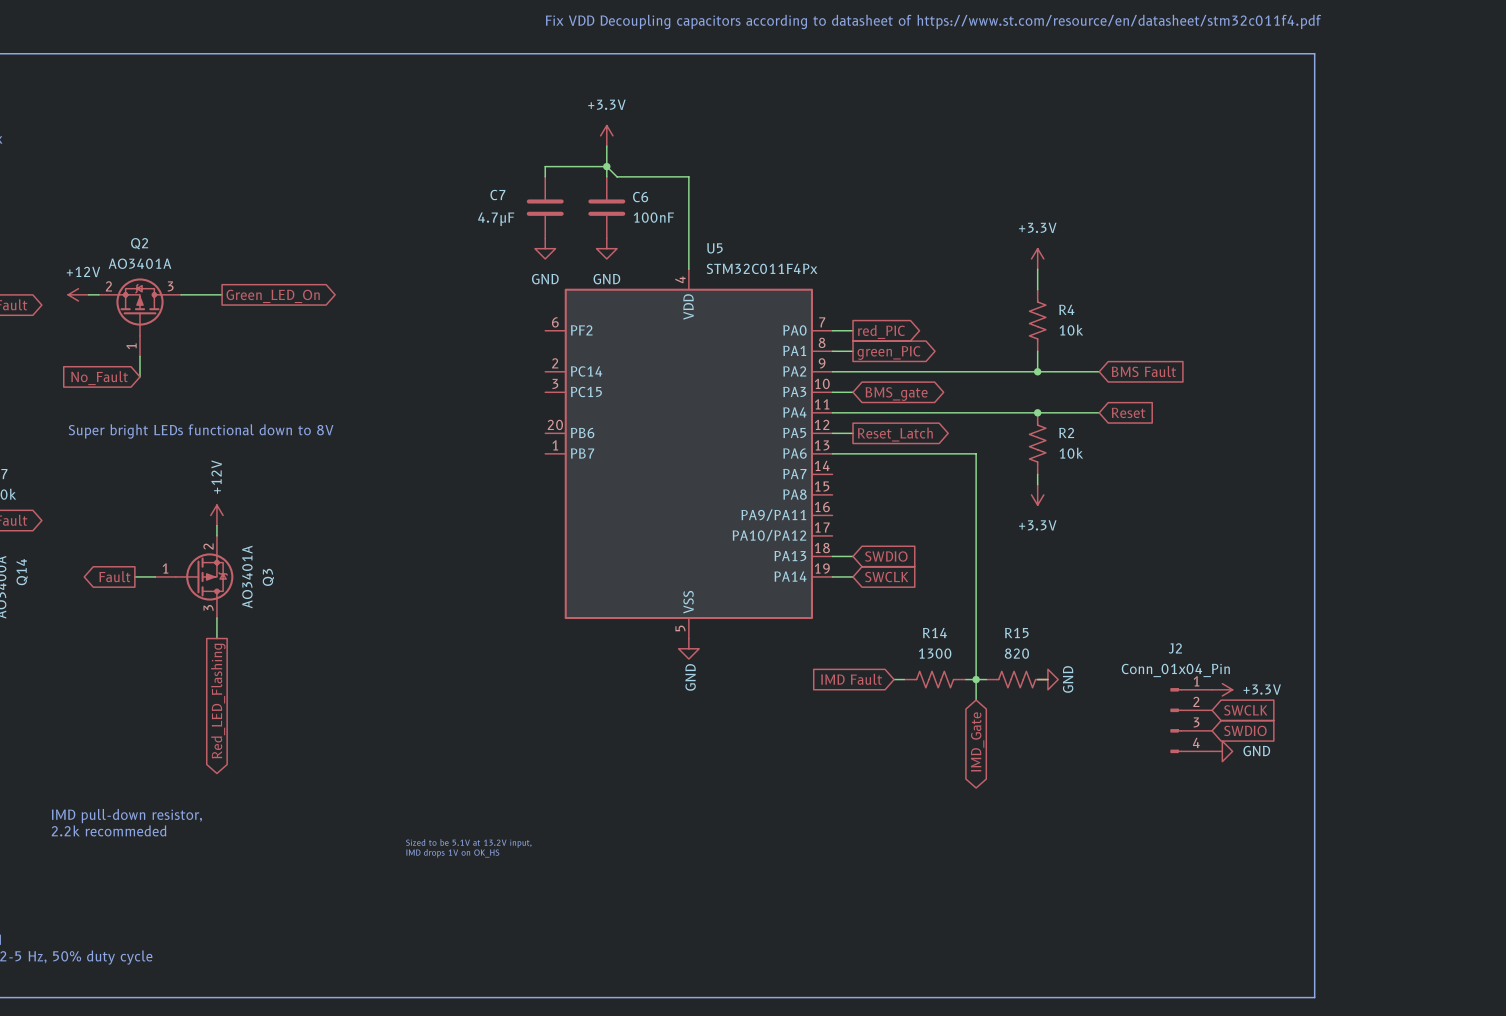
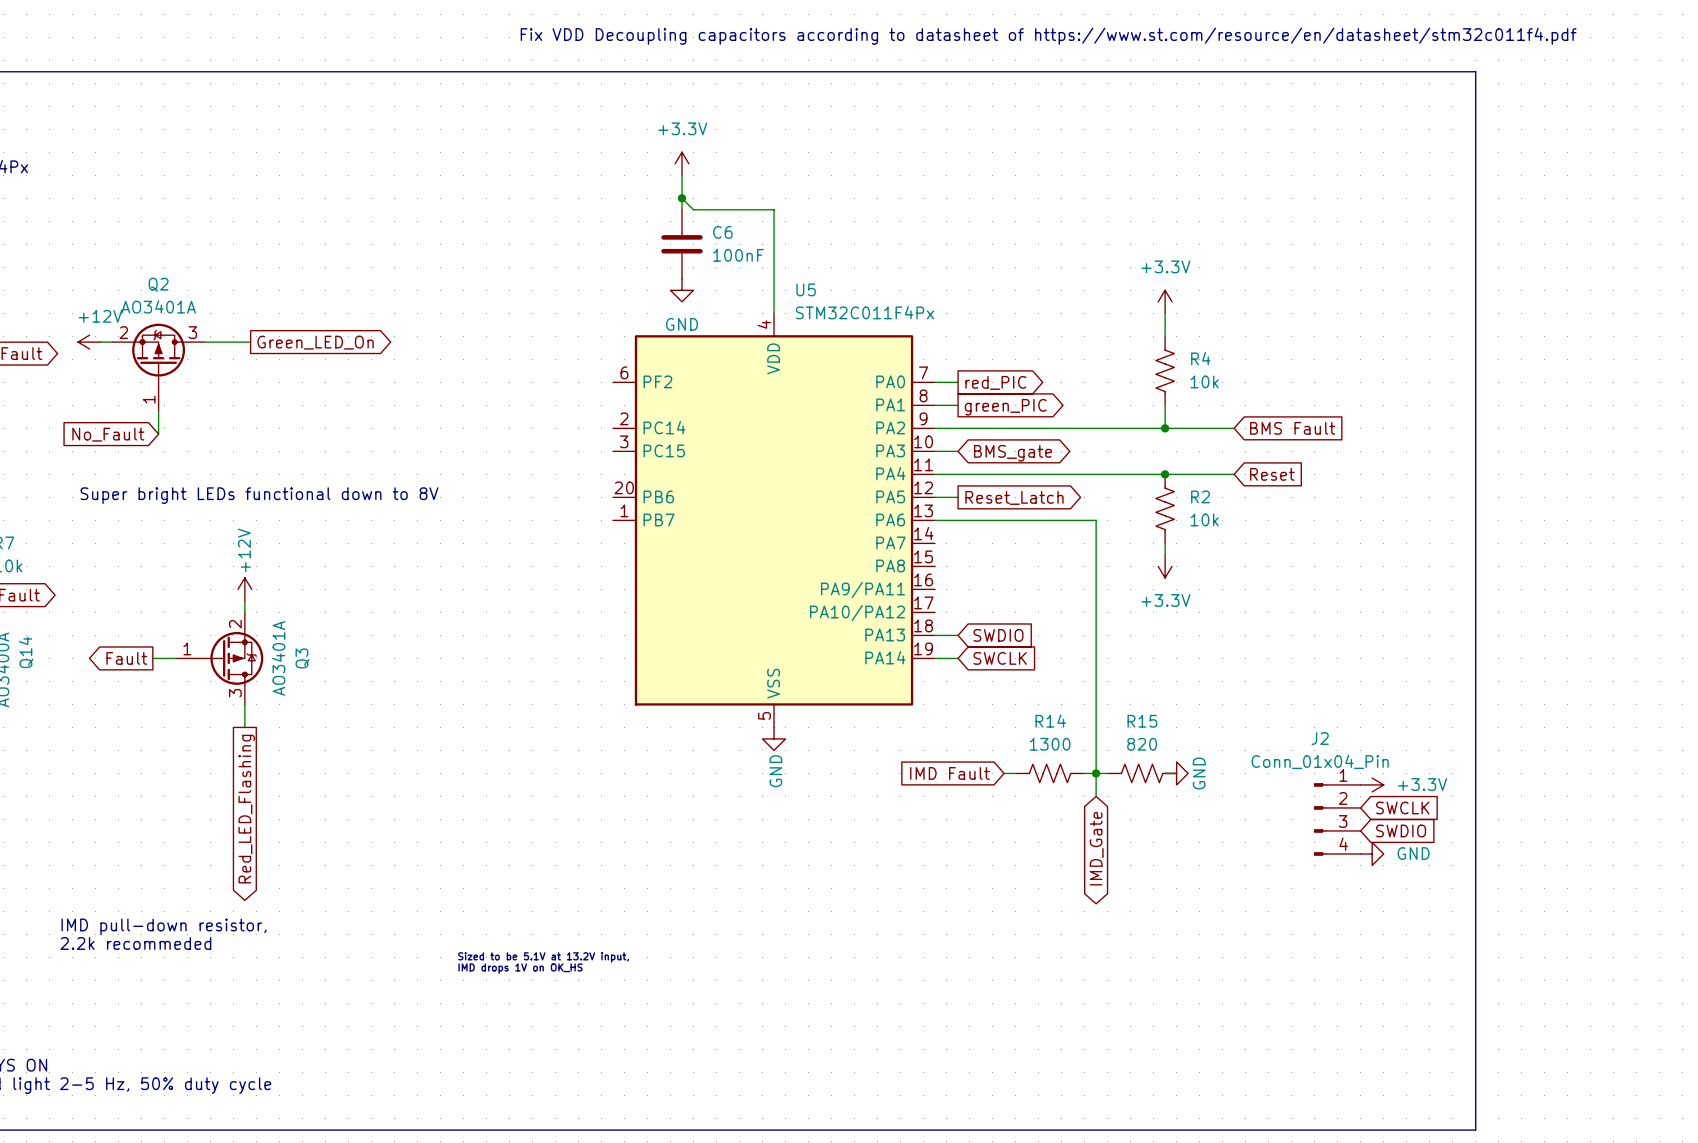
wire: (606, 166) (545, 166) (545, 176) -> none
C7: 4.7μF (545, 207) -> none
power symbol: GND (545, 248) -> none

